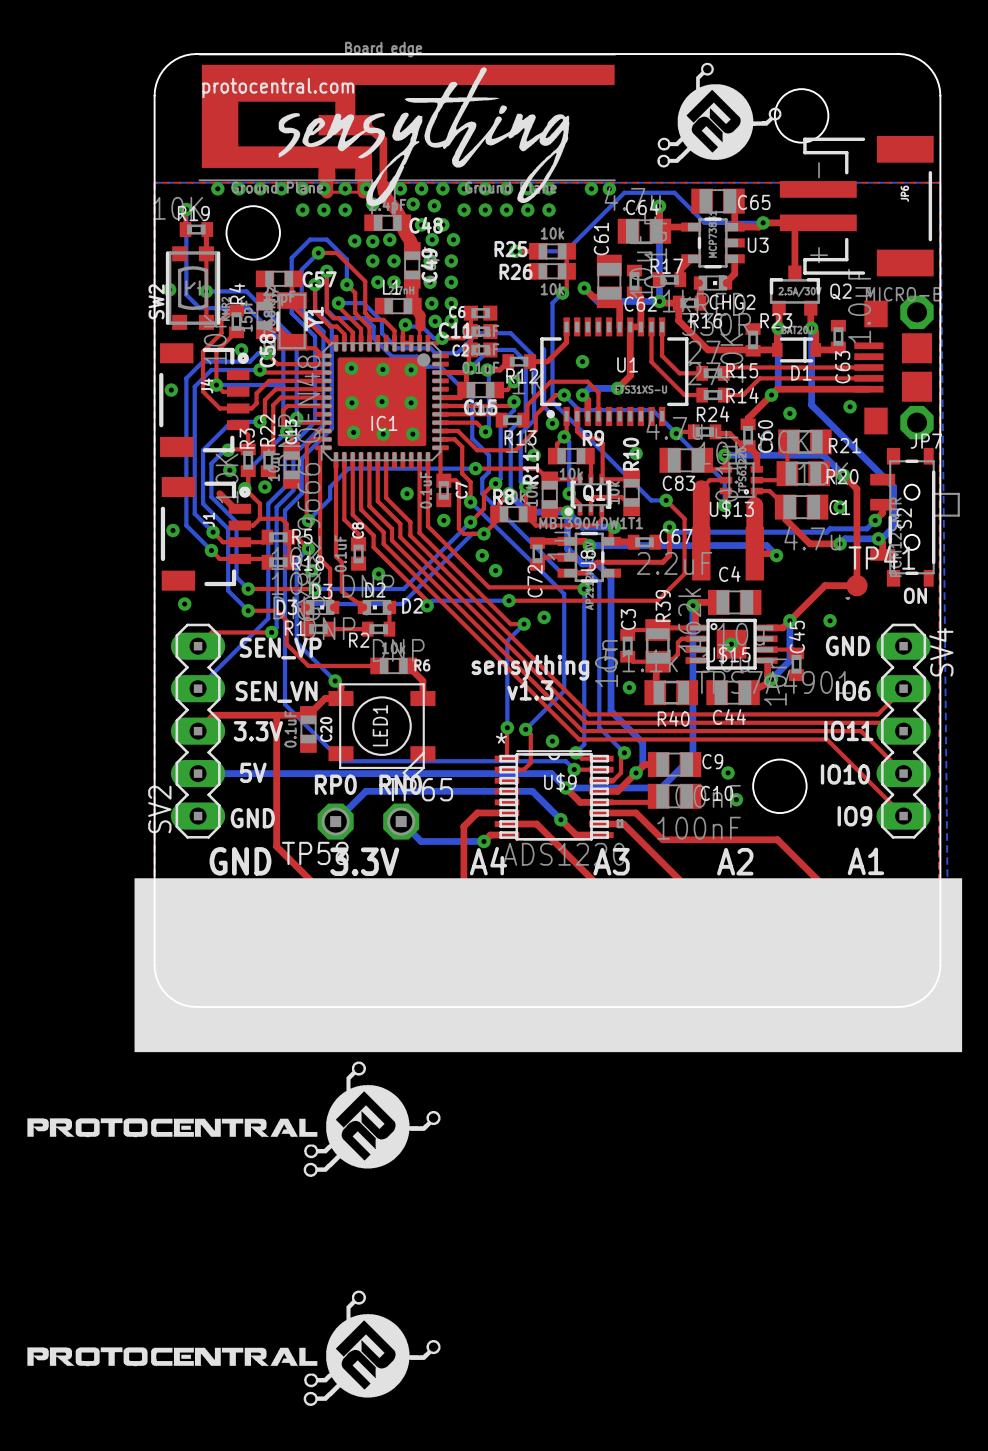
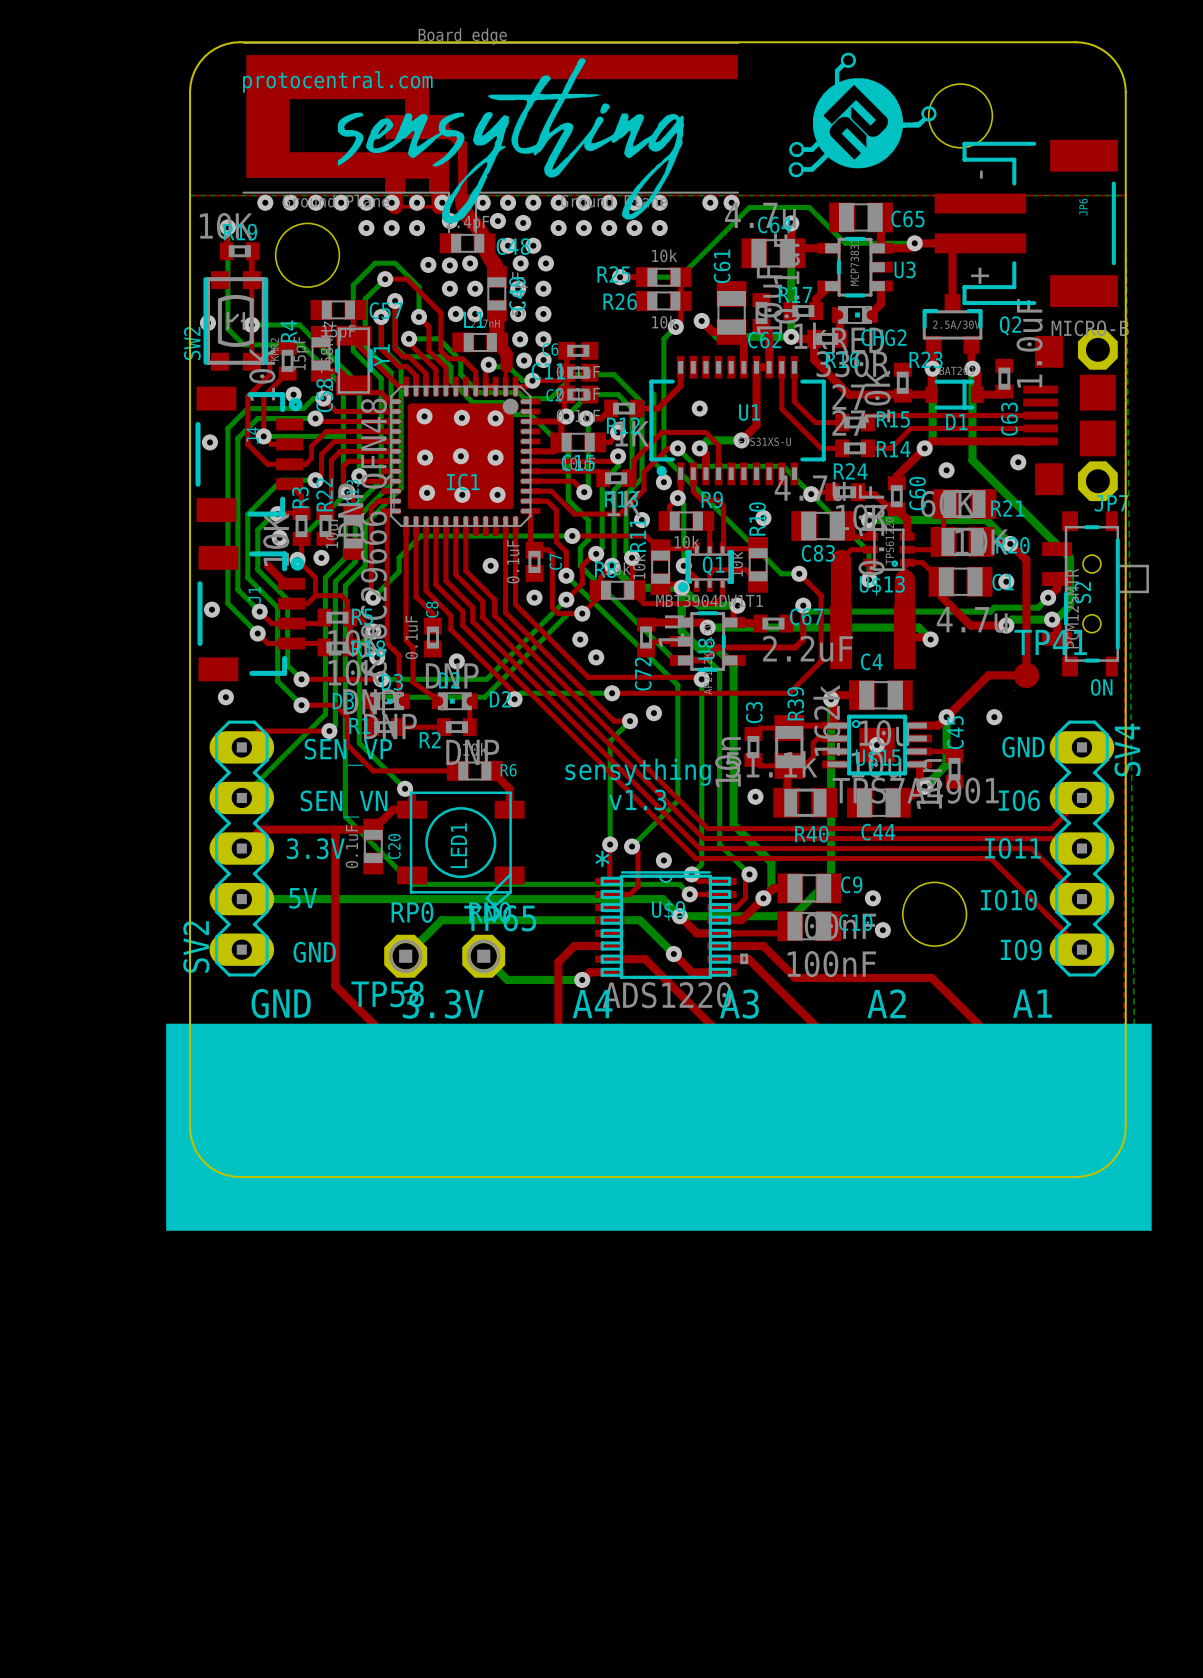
drawing: [27, 1061, 441, 1177] -> none
drawing: [27, 1290, 441, 1407] -> none

